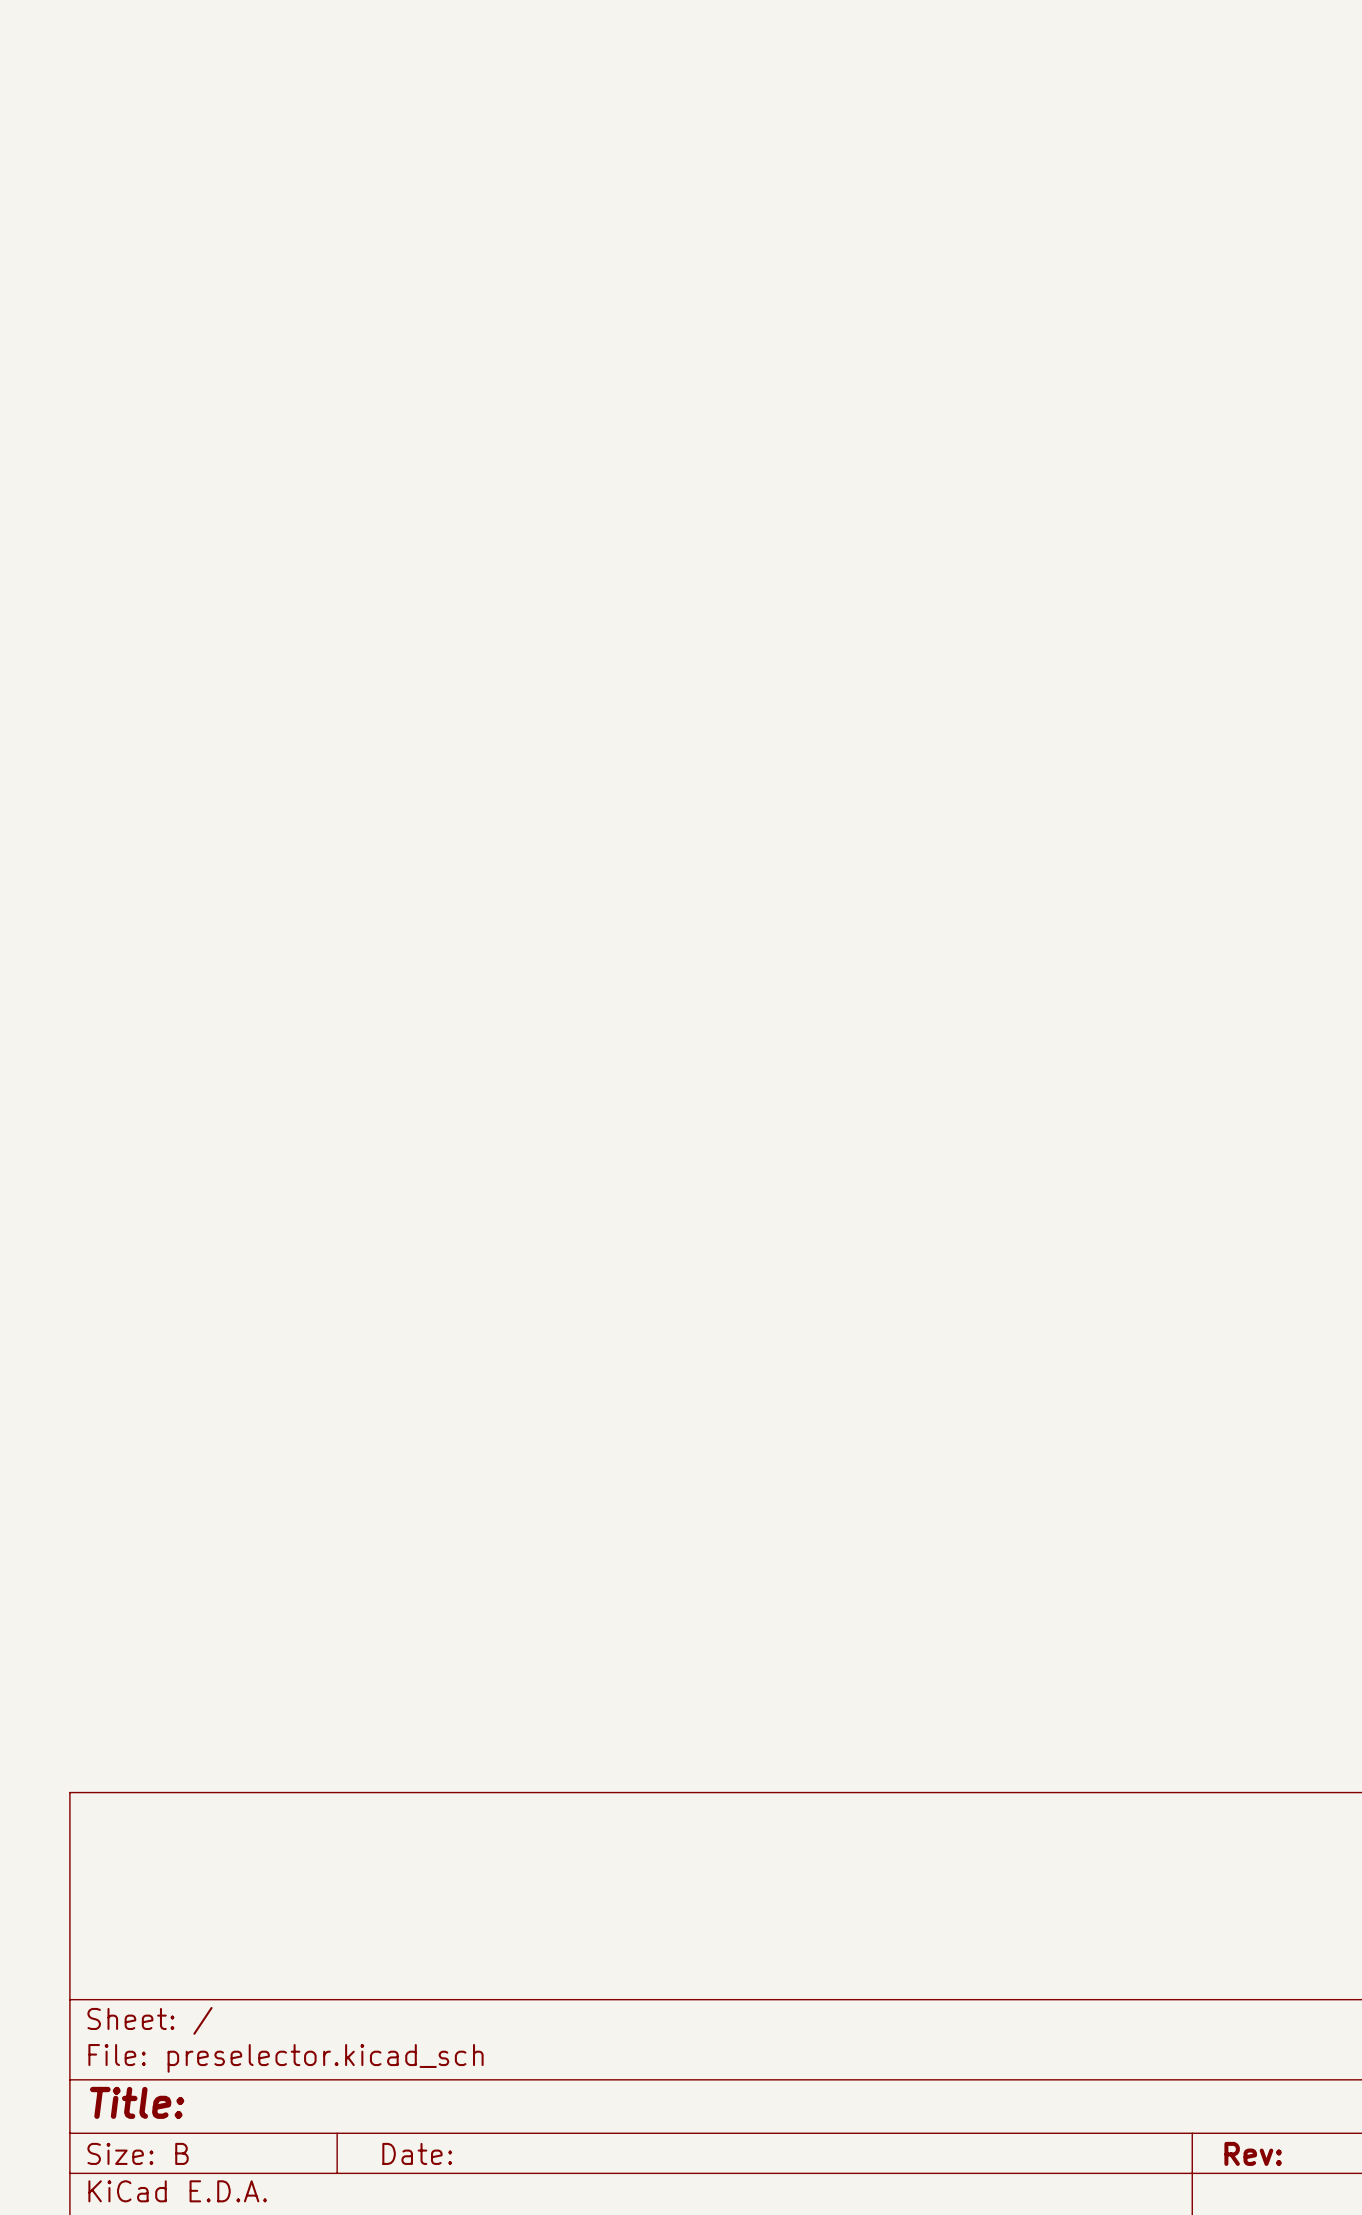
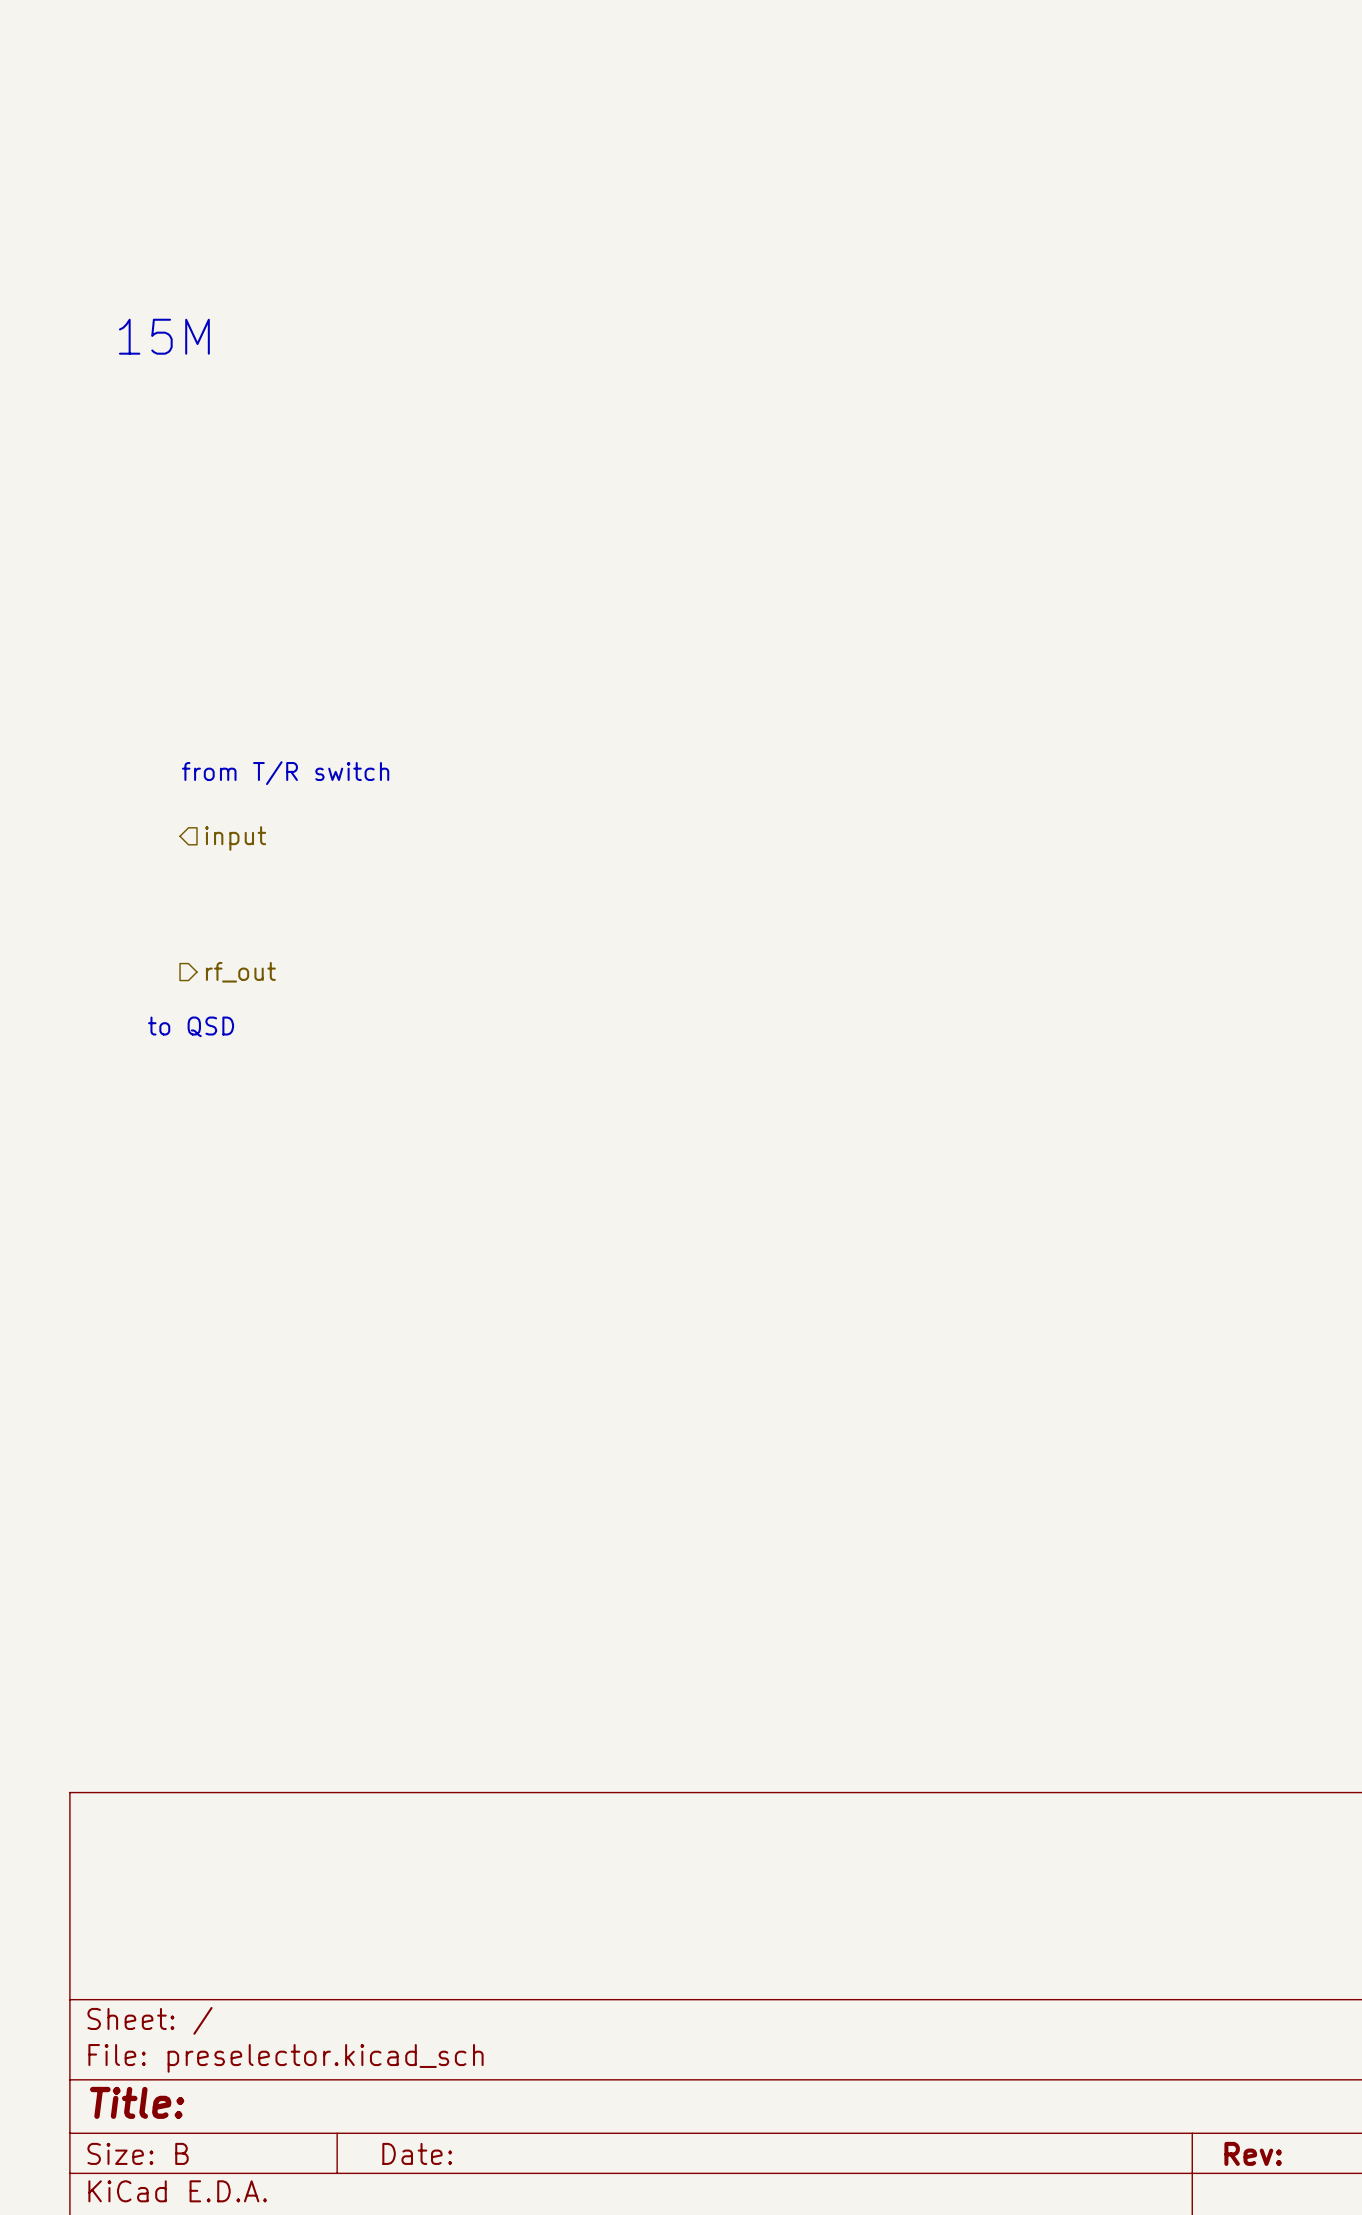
text: none -> 15M (164, 336)
text: none -> from T/R switch (285, 773)
hierarchical label: none -> input (235, 838)
hierarchical label: none -> rf_out (240, 972)
text: none -> to QSD (191, 1026)

